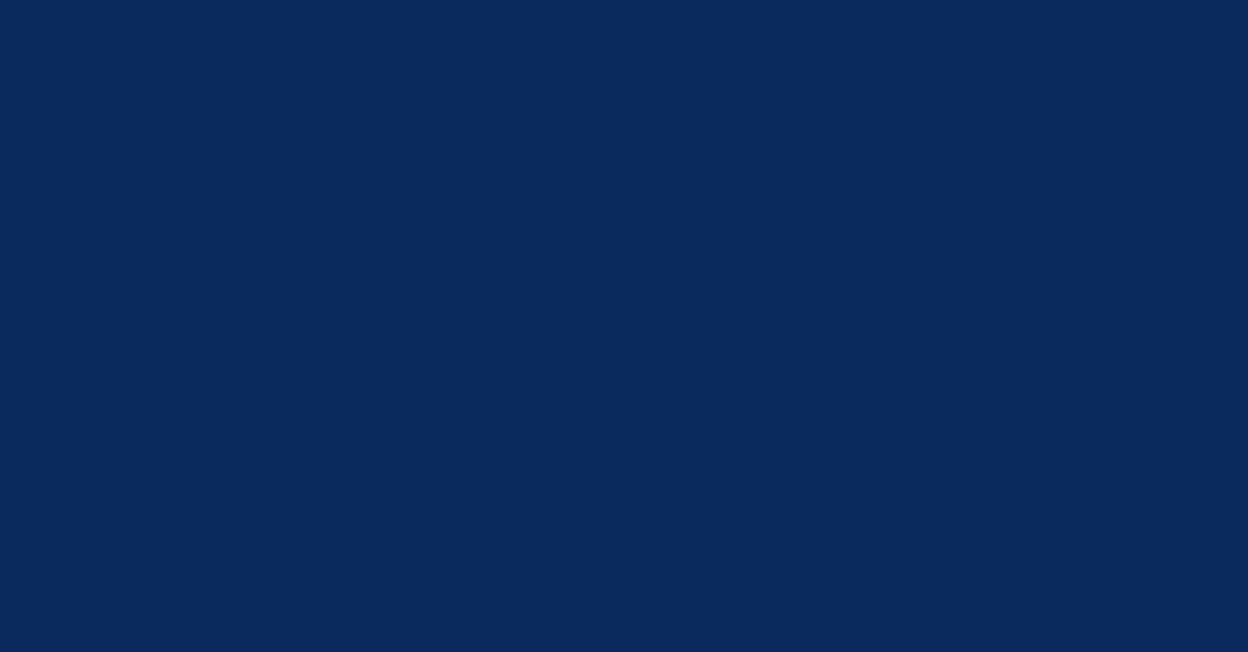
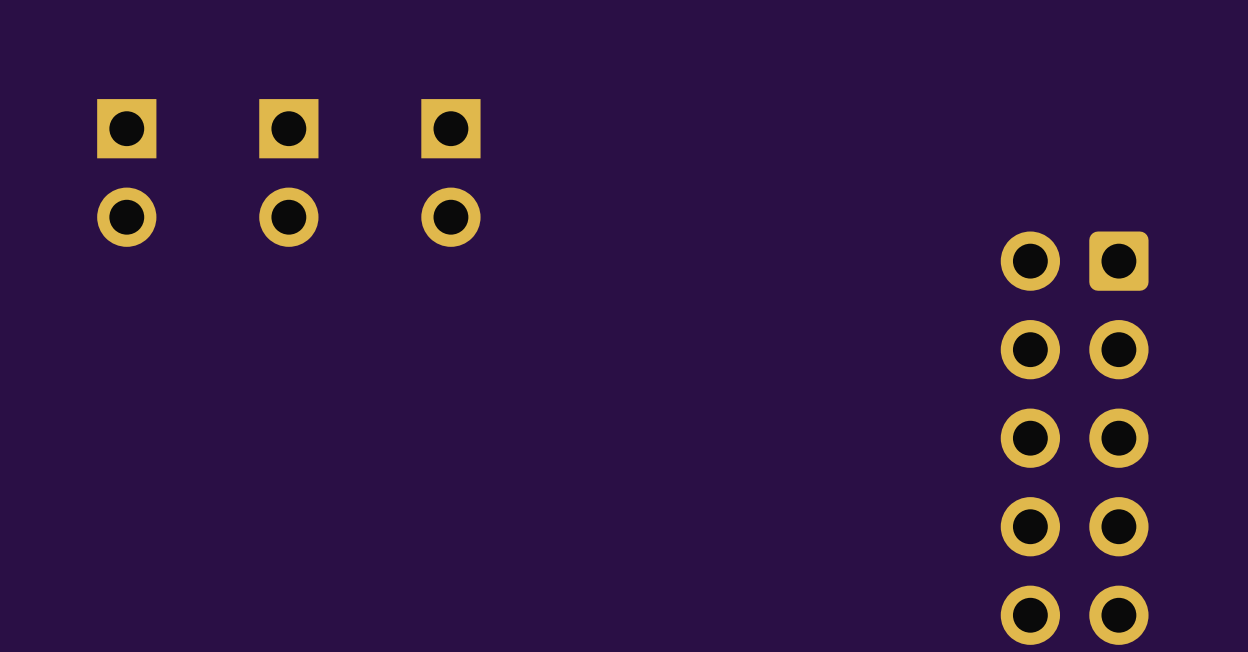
part: none -> (126, 172)
part: none -> (288, 172)
part: none -> (450, 172)
part: none -> (1074, 438)

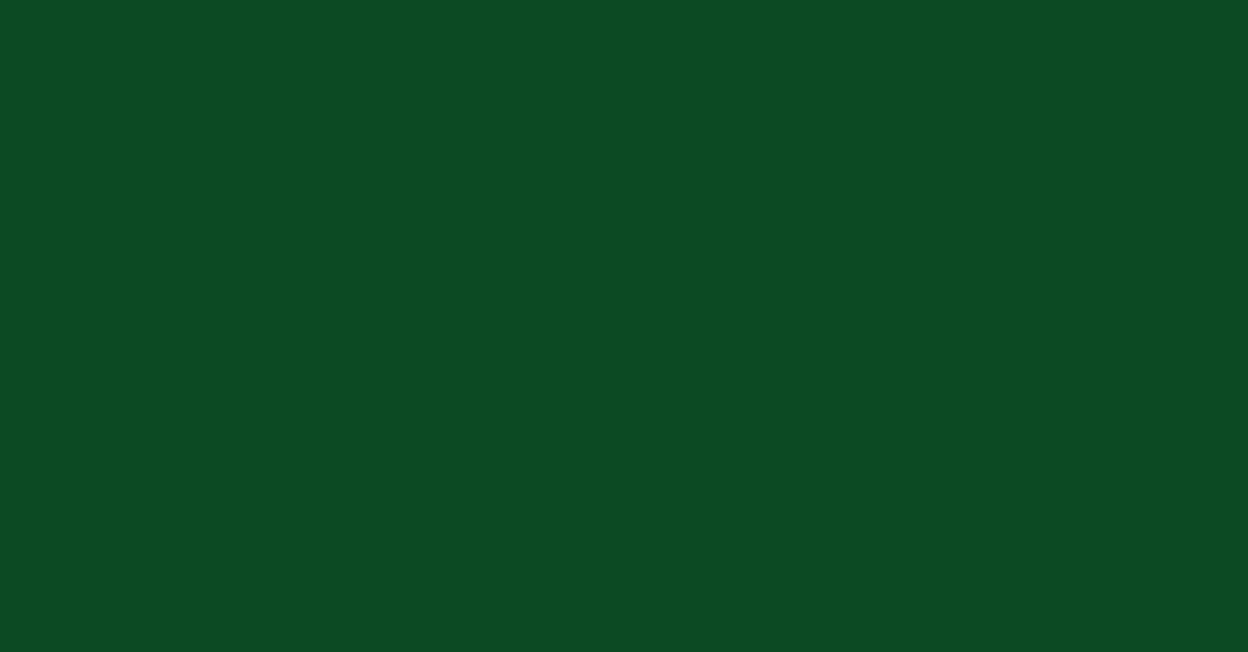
part: (126, 172) -> none
part: (288, 172) -> none
part: (450, 172) -> none
part: (1074, 438) -> none

